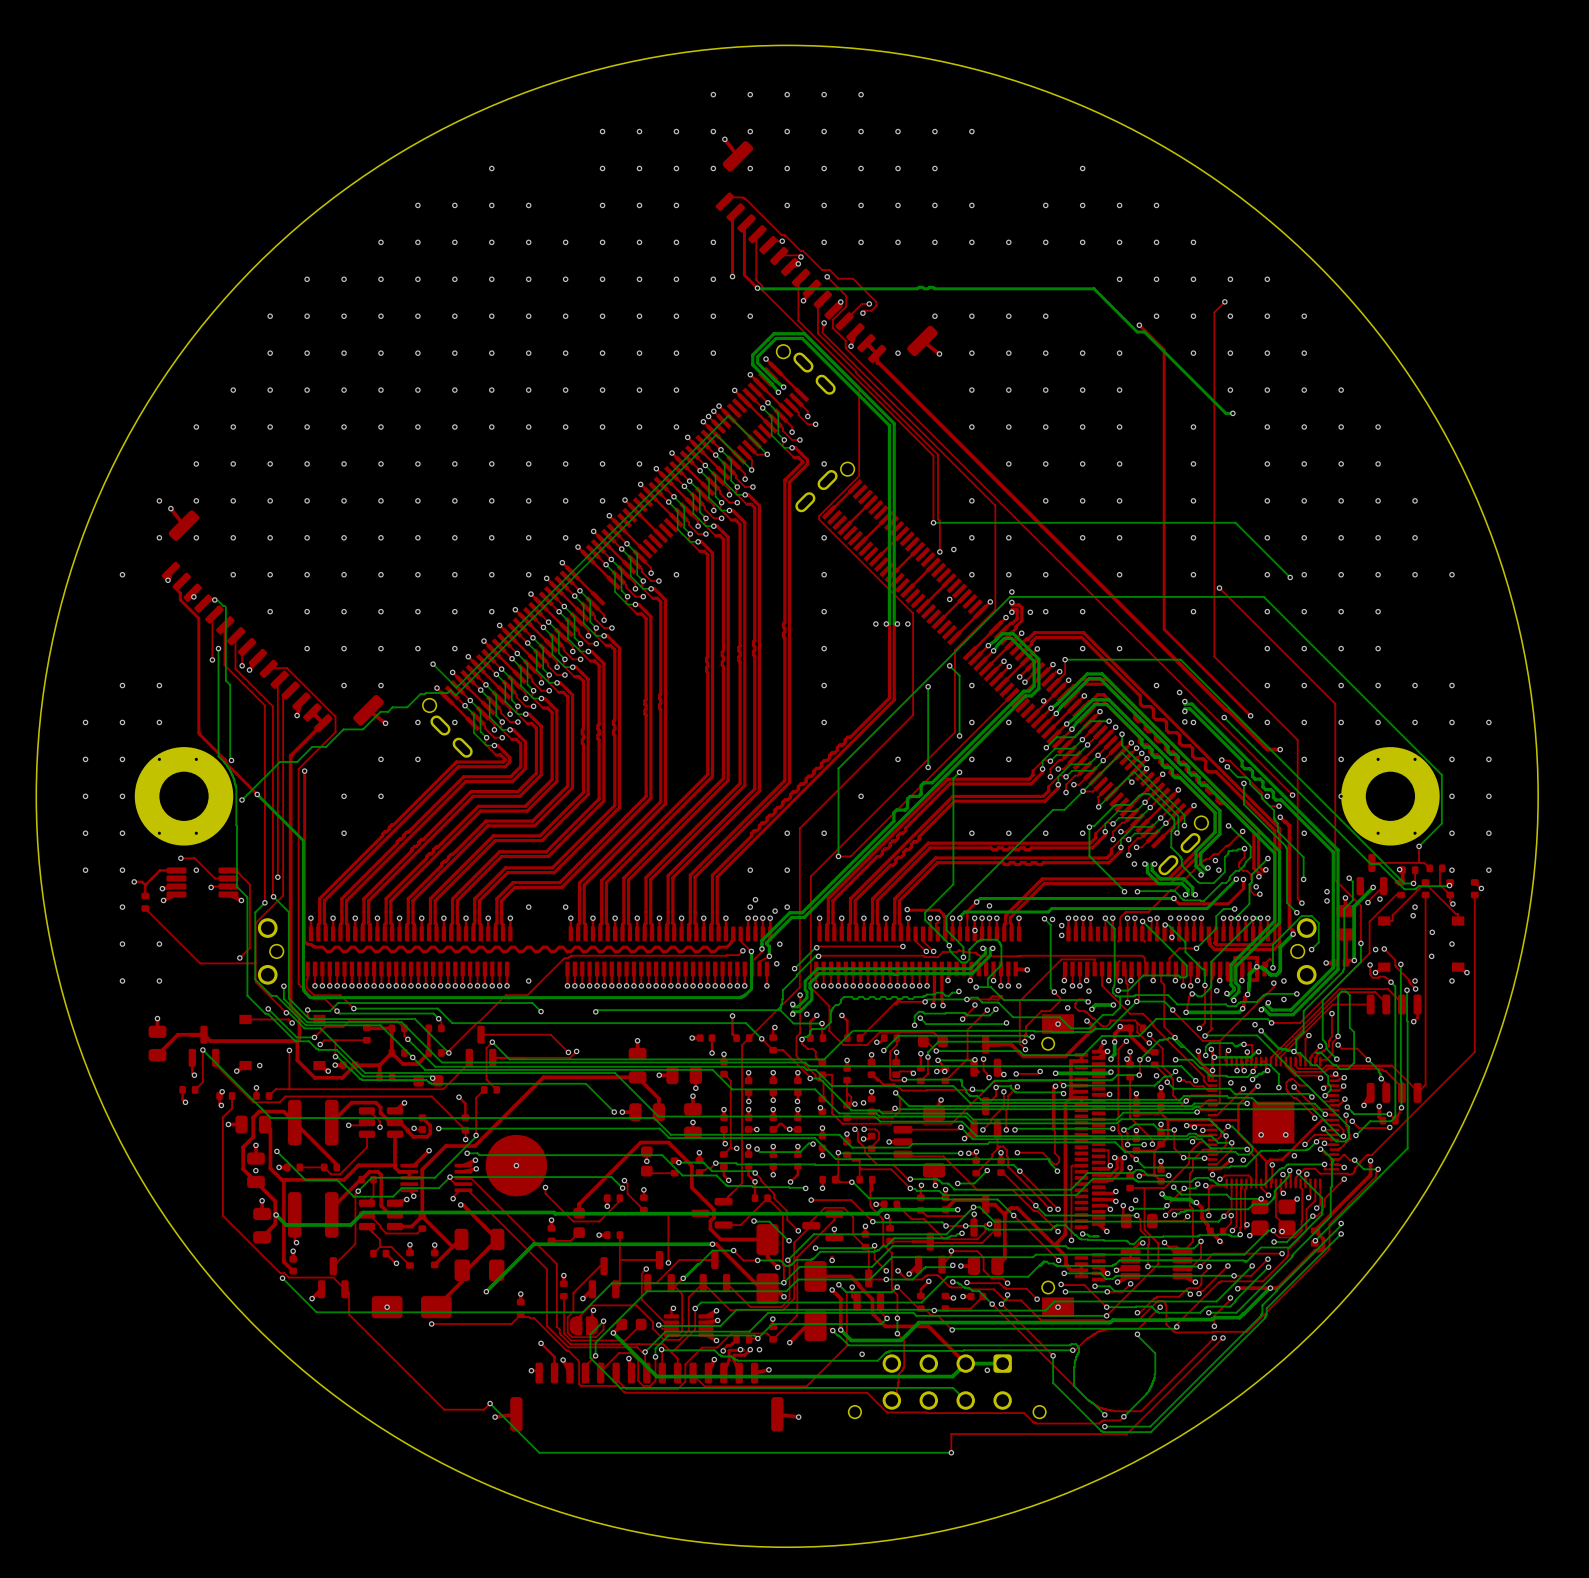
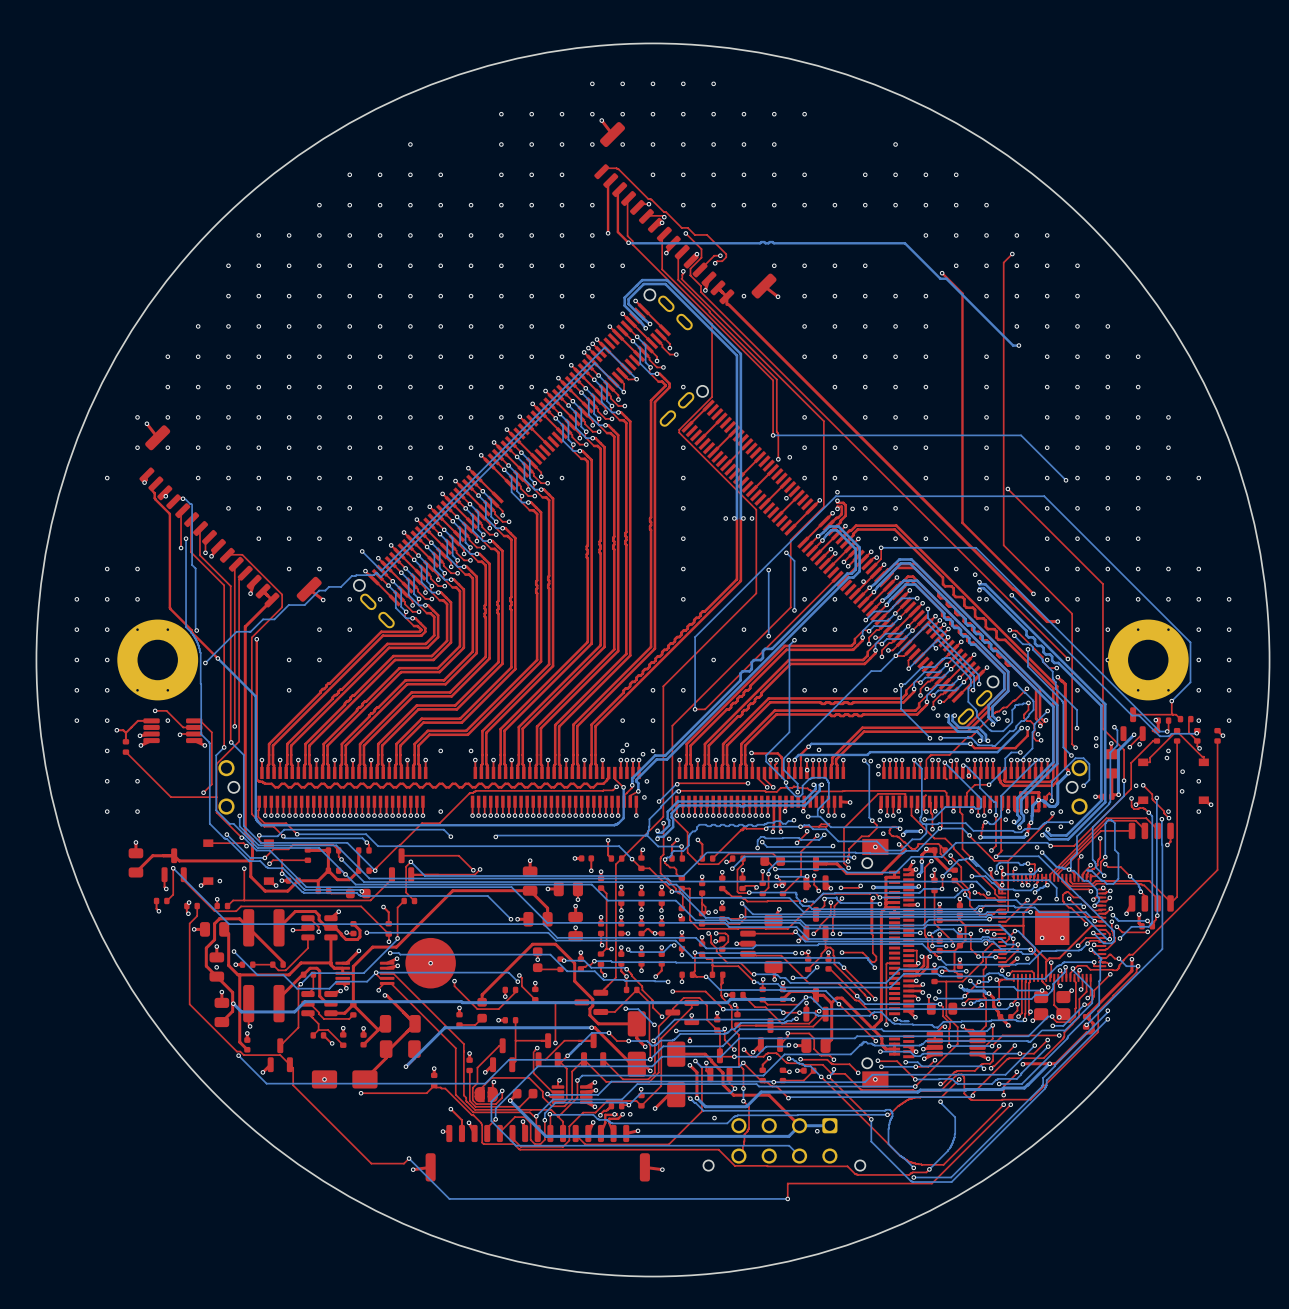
via: none -> (916, 980)

